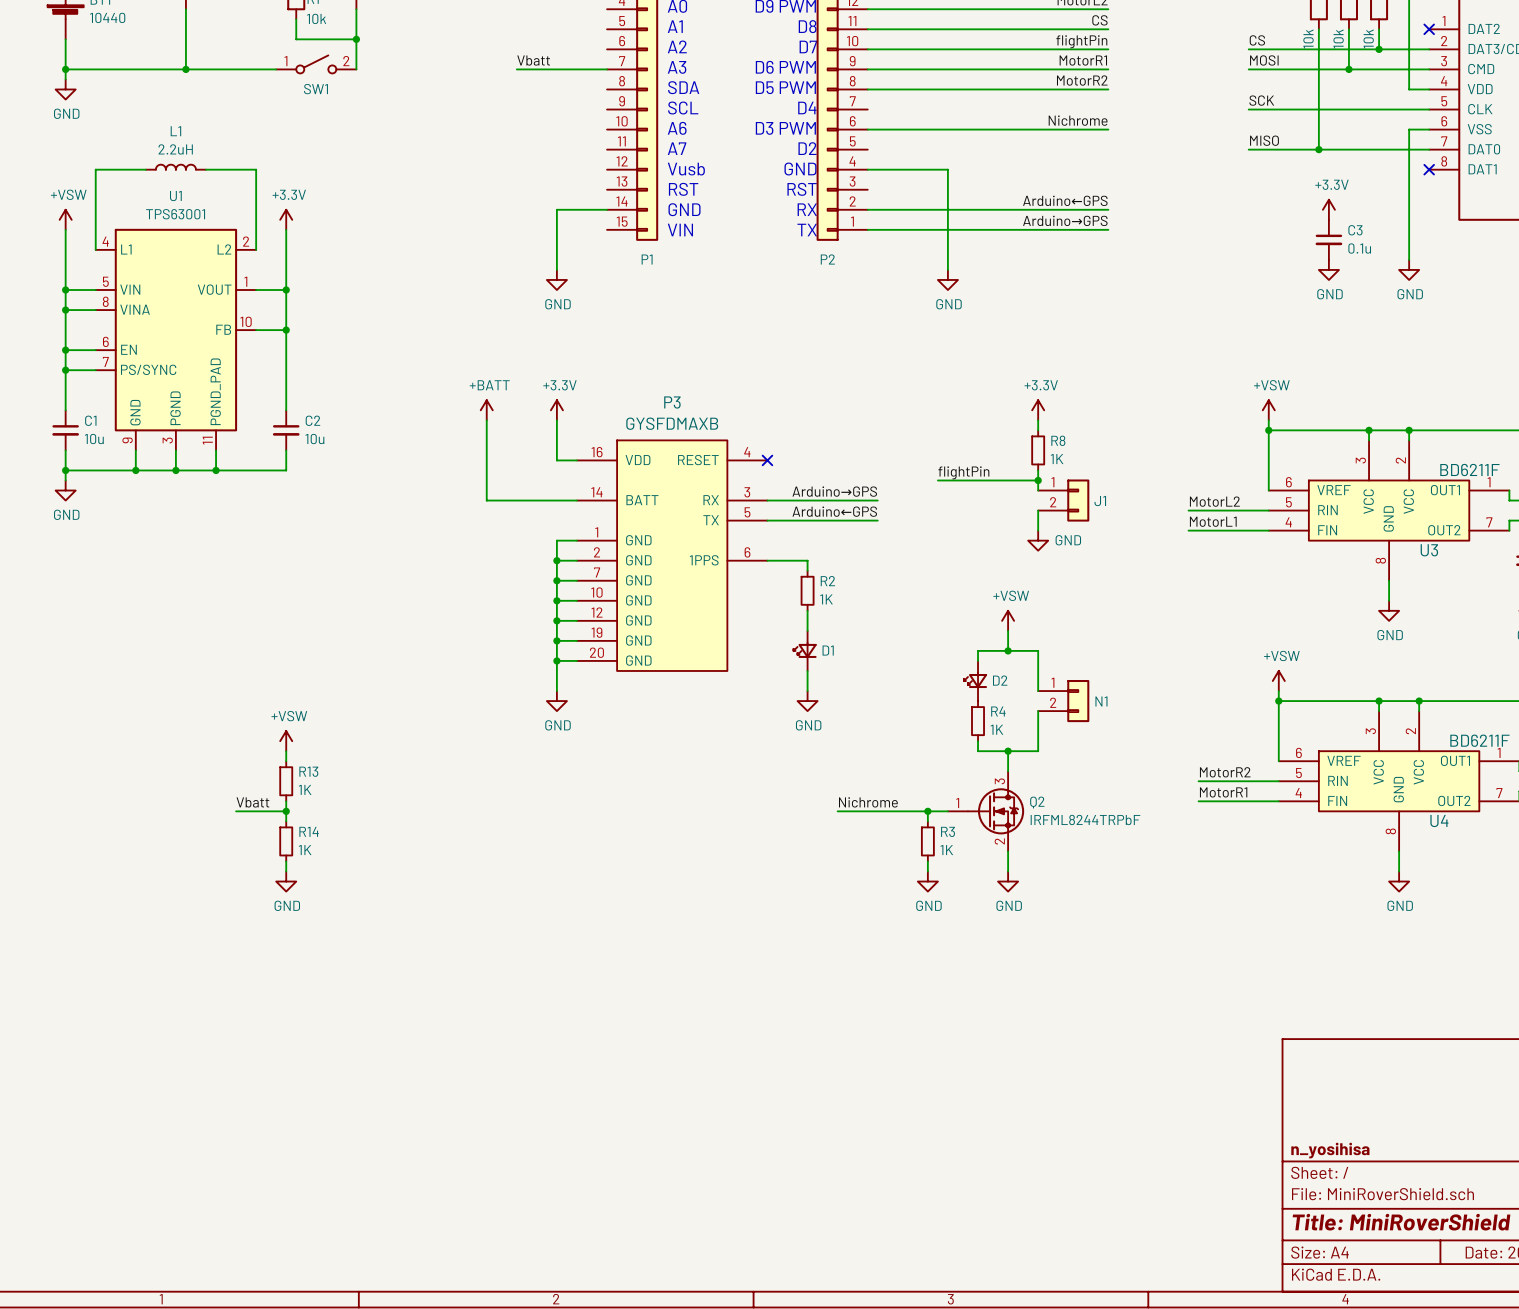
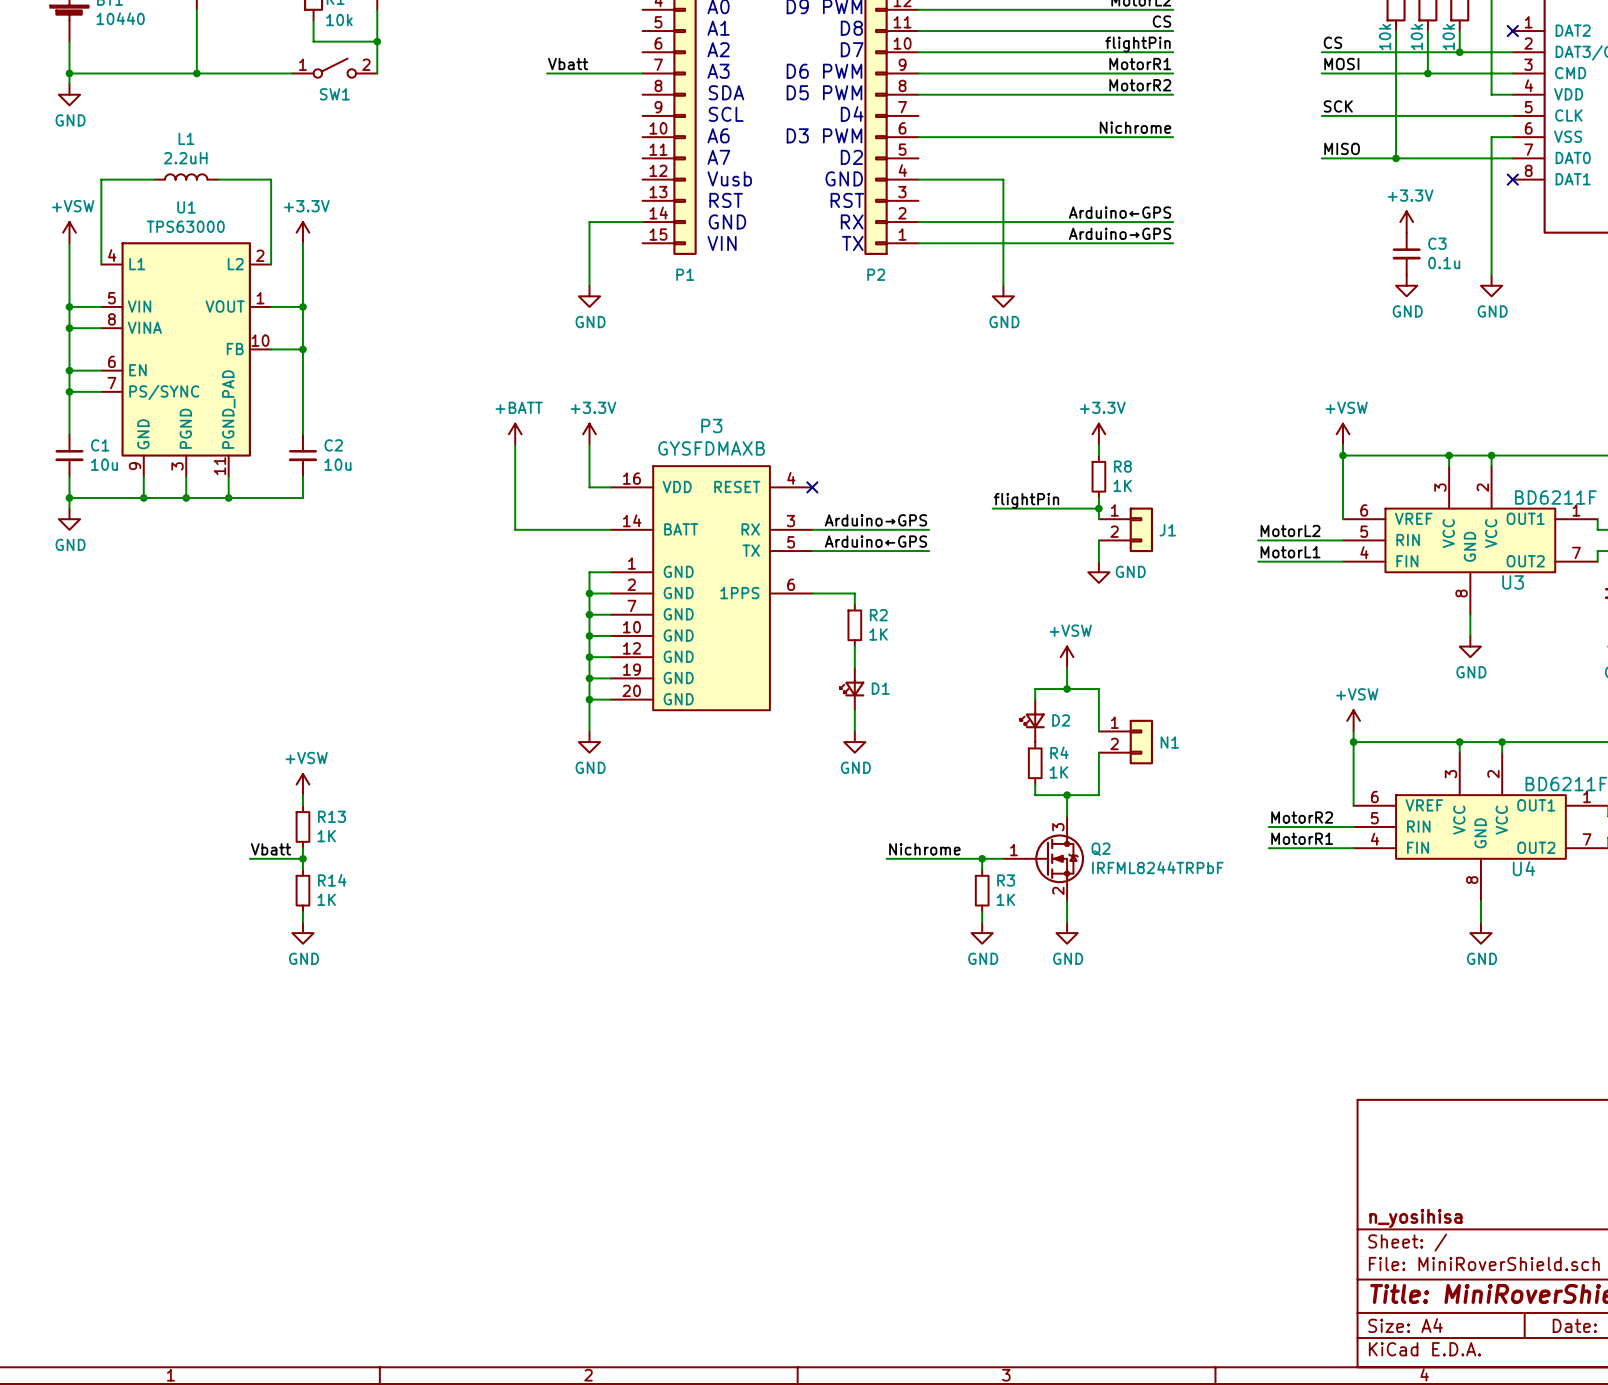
U1 value: TPS63001 (175, 214) -> TPS63000 (185, 226)

